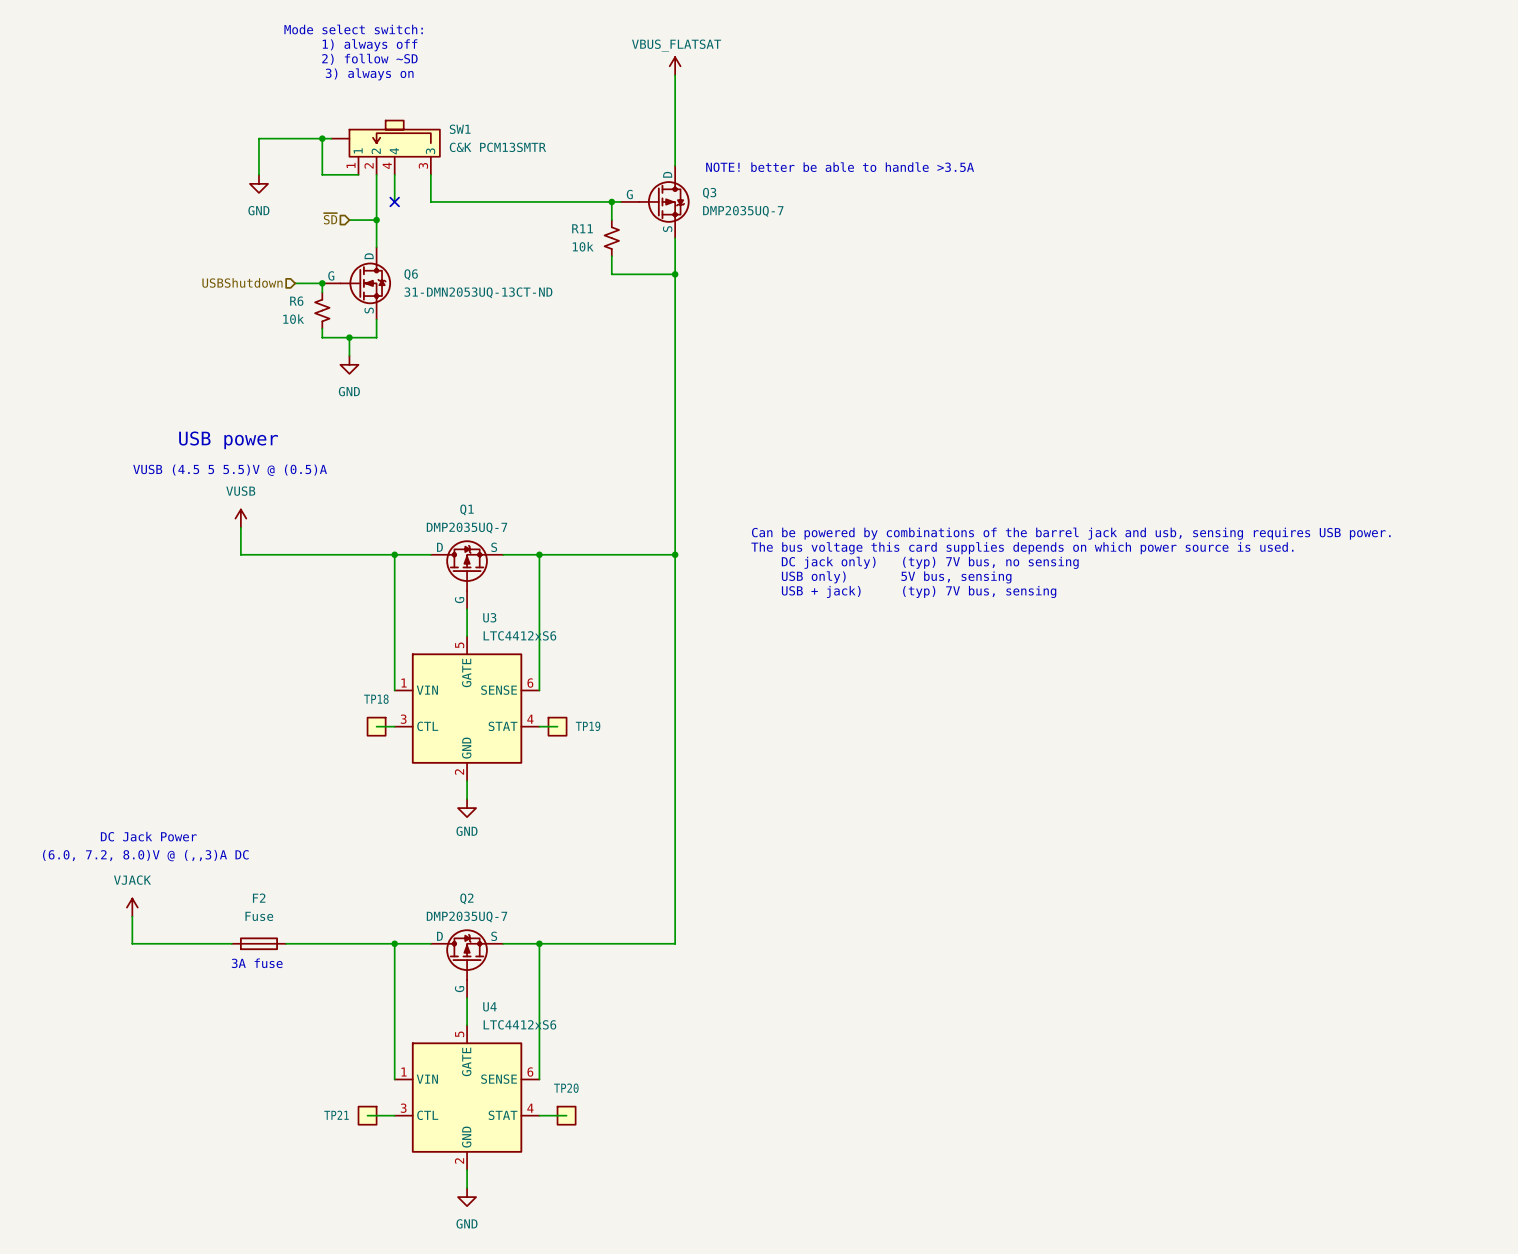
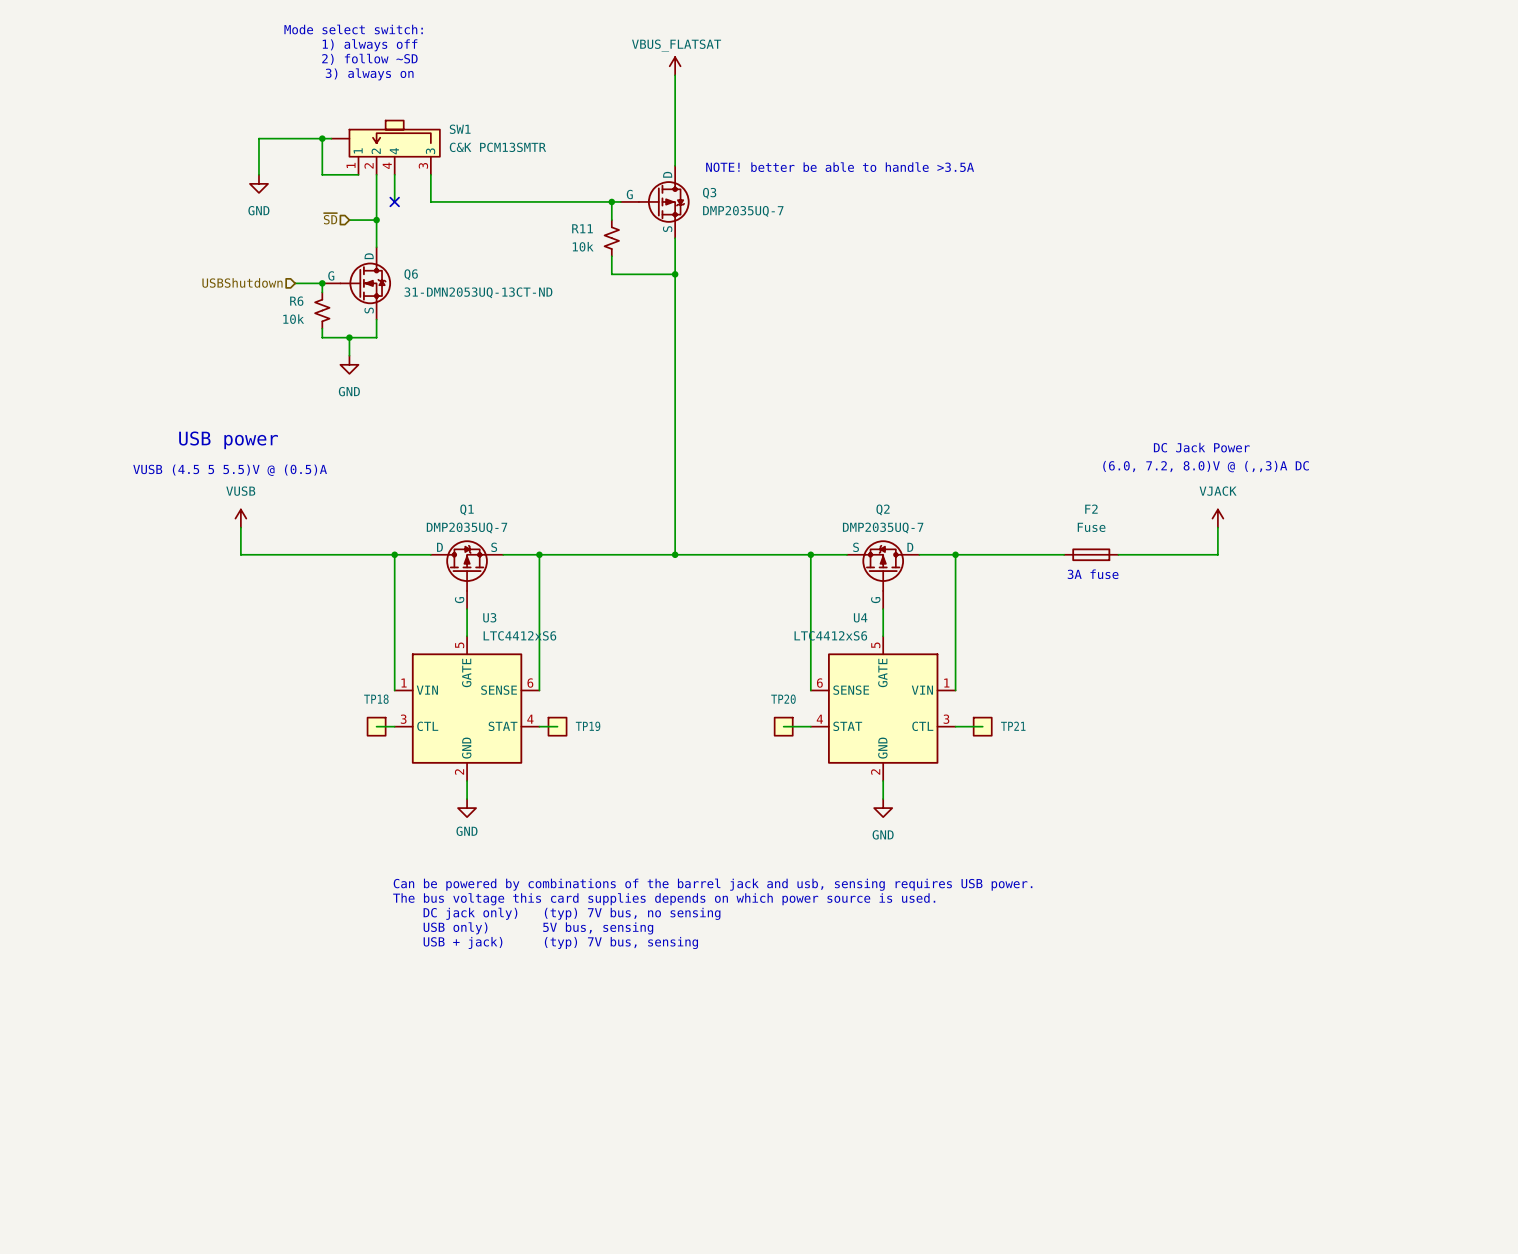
text: none -> DC Jack Power (1201, 447)
text: none -> (6.0, 7.2, 8.0)V @ (,,3)A DC (1206, 466)
power symbol: none -> VJACK (1217, 518)
wire: none -> (1217, 527) (1217, 554) (1118, 554)
text: Can be powered by combinations of the barrel jack and usb, sensing requires USB power. (1071, 533) -> none
text: The bus voltage this card supplies depends on which power source is used. (1022, 548) -> none
wire: (675, 554) (675, 943) (503, 943) -> (675, 554) (847, 554)
wire: none -> (810, 554) (810, 690)
junction: none -> (810, 554)
wire: none -> (919, 554) (1064, 554)
wire: none -> (955, 554) (955, 690)
junction: none -> (955, 554)
text: DC jack only) (typ) 7V bus, no sensing (930, 562) -> none
text: none -> 3A fuse (1093, 574)
text: USB only) 5V bus, sensing (896, 577) -> none
text: USB + jack) (typ) 7V bus, sensing (919, 591) -> none
wire: none -> (883, 609) (883, 636)
wire: none -> (783, 726) (810, 726)
wire: none -> (955, 726) (982, 726)
wire: none -> (883, 780) (883, 799)
power symbol: none -> GND (883, 808)
text: DC Jack Power (148, 836) -> none
text: (6.0, 7.2, 8.0)V @ (,,3)A DC (145, 855) -> none
text: none -> Can be powered by combinations of the barrel jack and usb, sensing requires USB power. (713, 884)
text: none -> The bus voltage this card supplies depends on which power source is used. (664, 899)
power symbol: VJACK (132, 907) -> none
text: none -> DC jack only) (typ) 7V bus, no sensing (572, 913)
wire: (132, 916) (132, 943) (231, 943) -> none
text: none -> USB only) 5V bus, sensing (538, 928)
text: none -> USB + jack) (typ) 7V bus, sensing (560, 942)
F2 position: (258, 943) -> (1091, 554)
wire: (286, 943) (430, 943) -> none
wire: (394, 943) (394, 1079) -> none
junction: (394, 943) -> none
wire: (539, 943) (539, 1079) -> none
junction: (539, 943) -> none
Q2 flip: as is (467, 954) -> left-right (883, 565)
text: 3A fuse (257, 963) -> none
Q2 position: (467, 963) -> (883, 574)
wire: (467, 998) (467, 1025) -> none
U4 flip: as is (467, 1097) -> left-right (883, 708)
U4 position: (467, 1097) -> (883, 708)
TP21 name position: TP21 (336, 1115) -> TP21 (1013, 726)
wire: (367, 1115) (394, 1115) -> none
TP21 position: (367, 1115) -> (982, 726)
wire: (539, 1115) (566, 1115) -> none
TP20 position: (566, 1115) -> (783, 726)
wire: (467, 1169) (467, 1188) -> none
power symbol: GND (467, 1197) -> none

